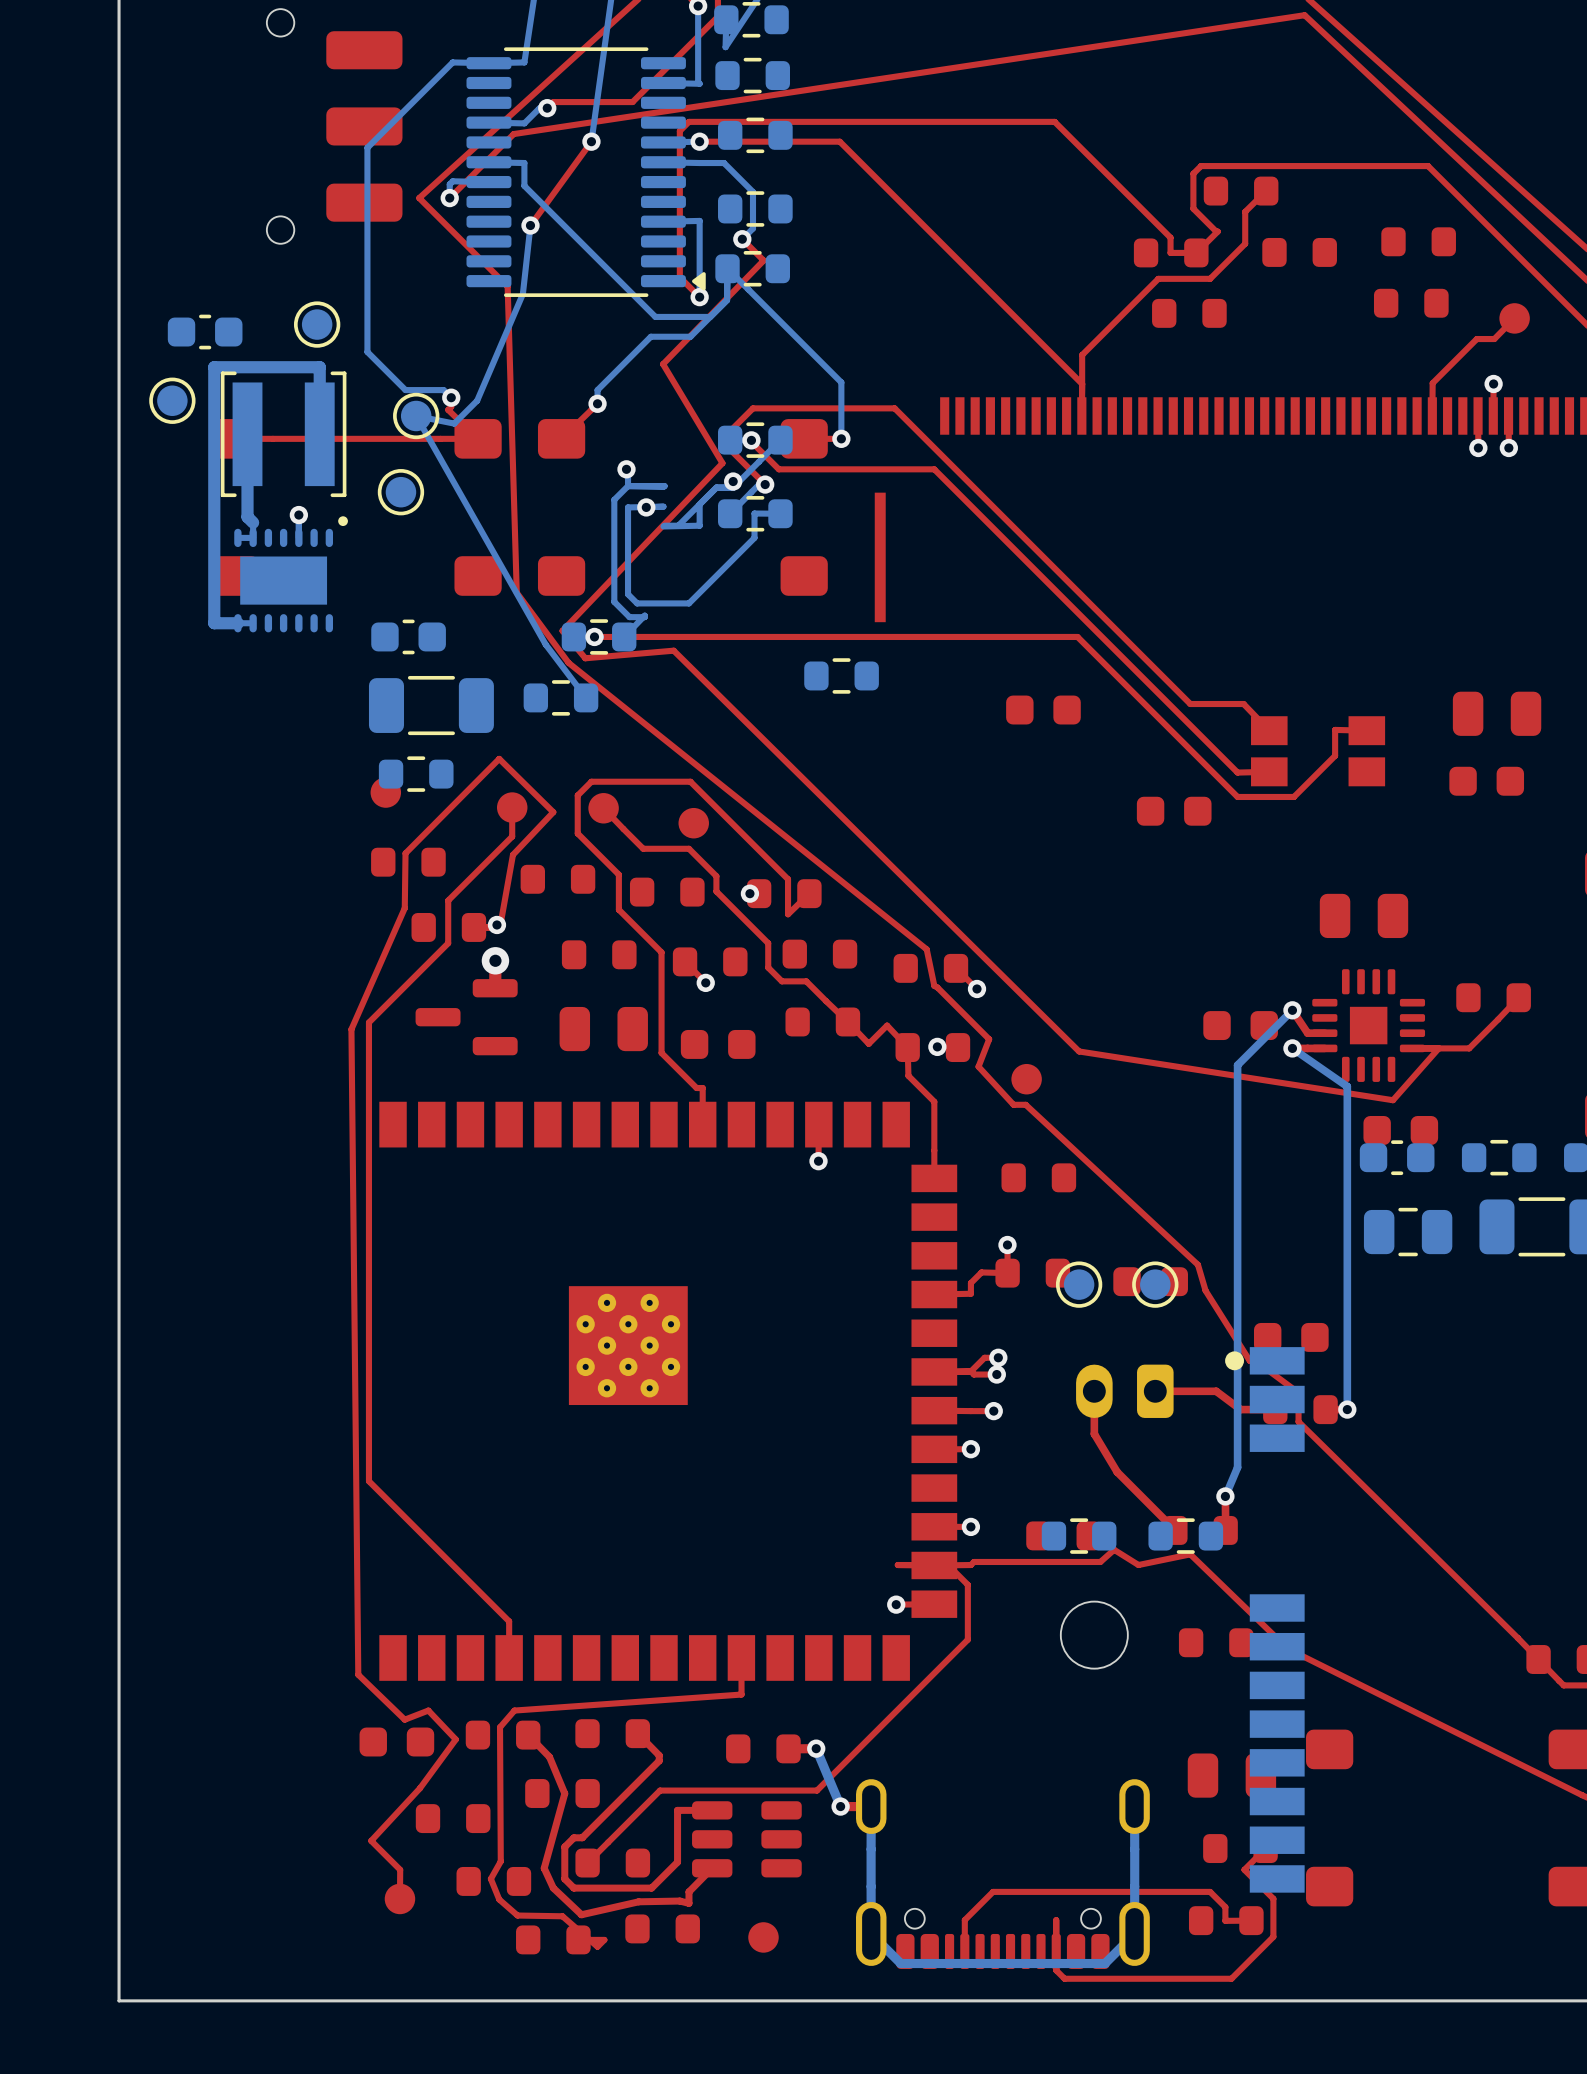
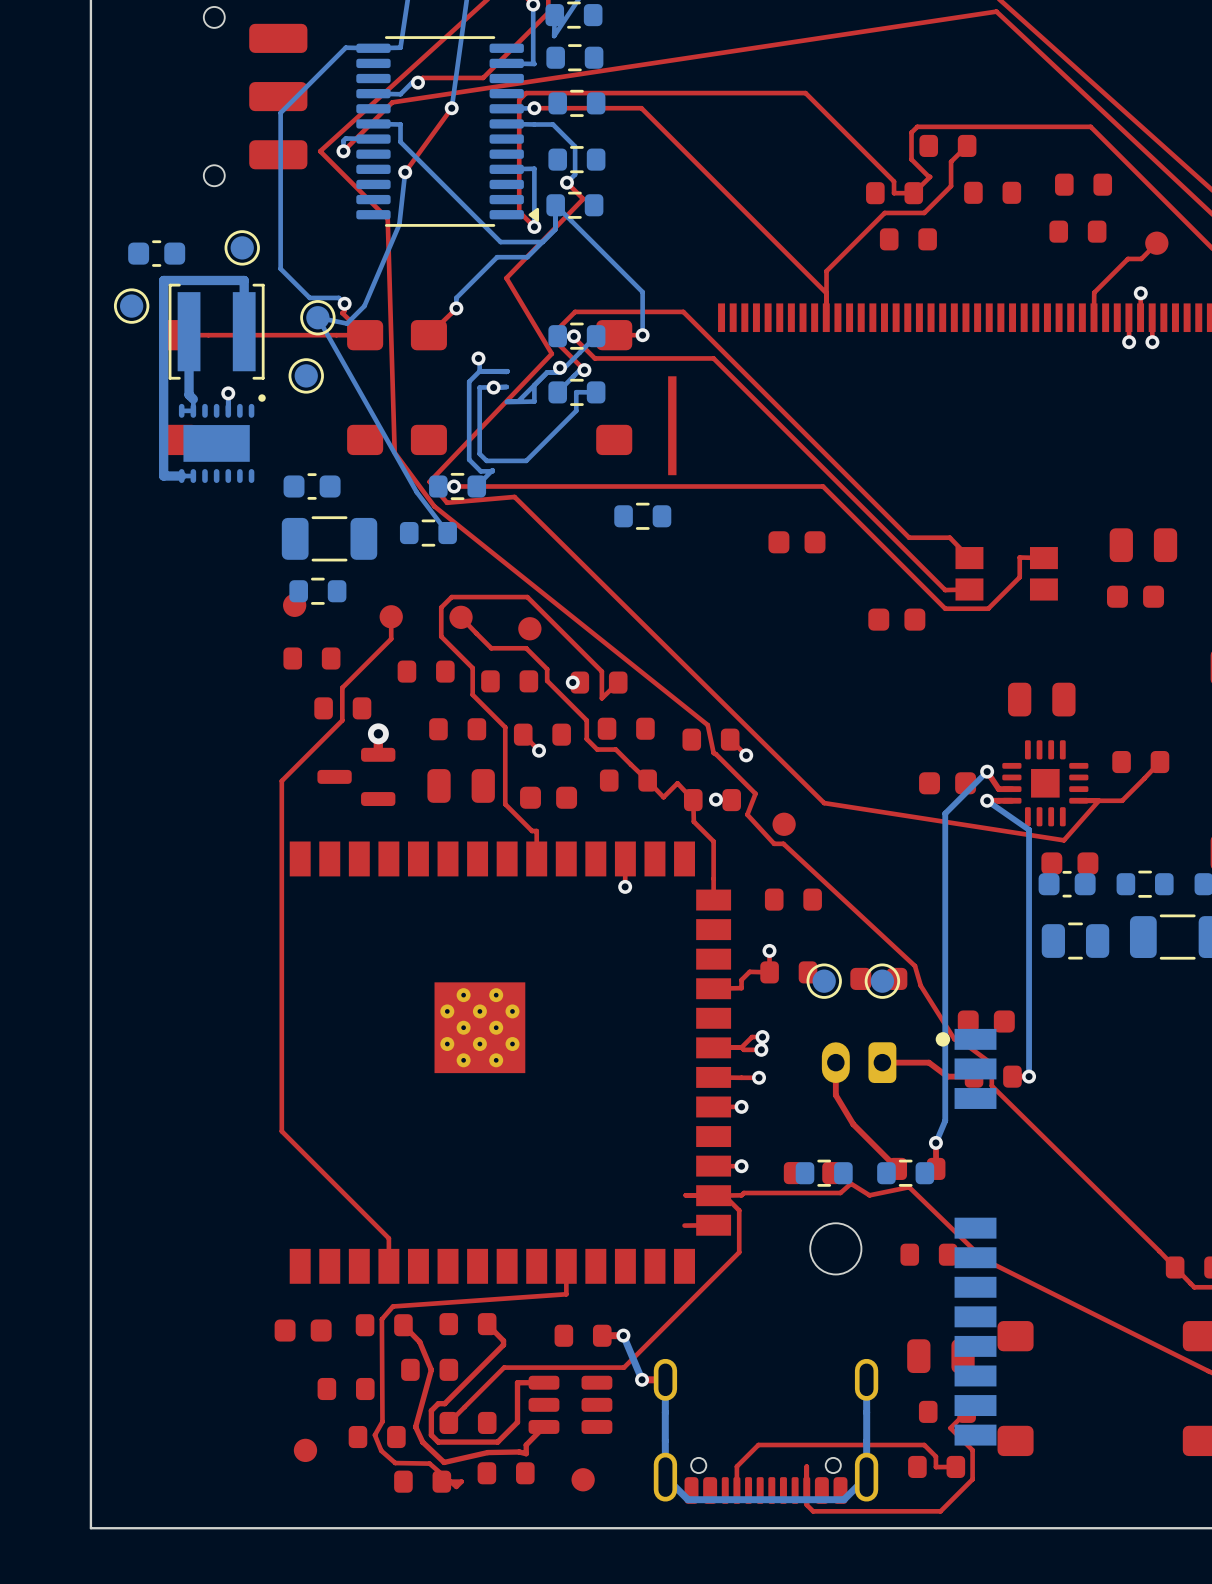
top track: (496, 924) (498, 924) (501, 928) (473, 927) (500, 927) (512, 854) (553, 812) (499, 758) (405, 853) (404, 908) (351, 1029) (358, 1674) (404, 1719) (428, 1710) (455, 1739) (420, 1788) (371, 1840) (400, 1869) (399, 1898) -> none
via: (496, 924) -> none
via: (896, 1604) -> none

